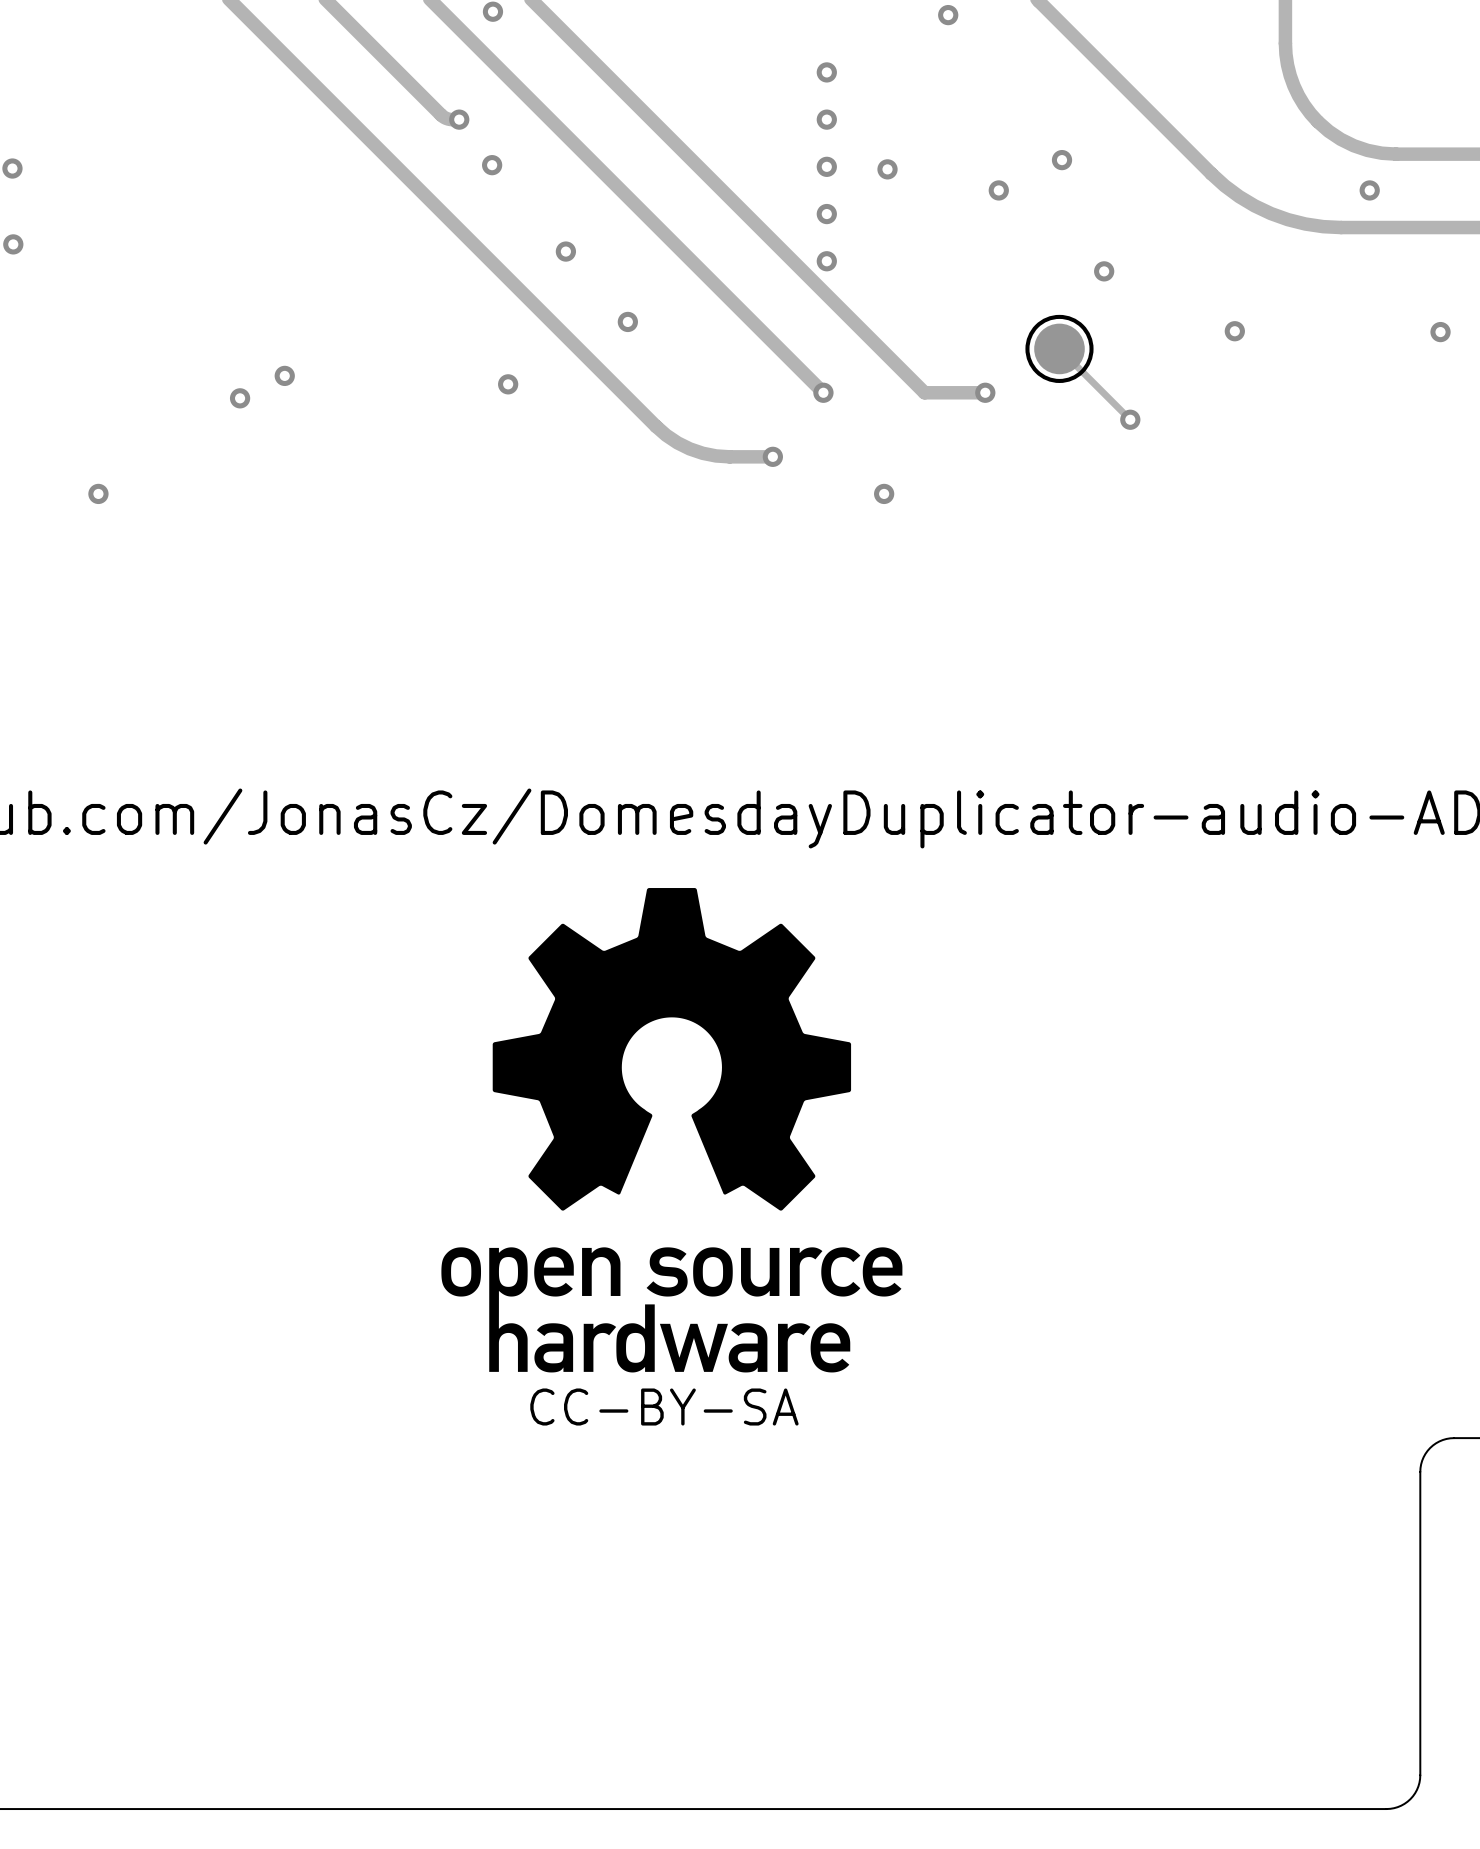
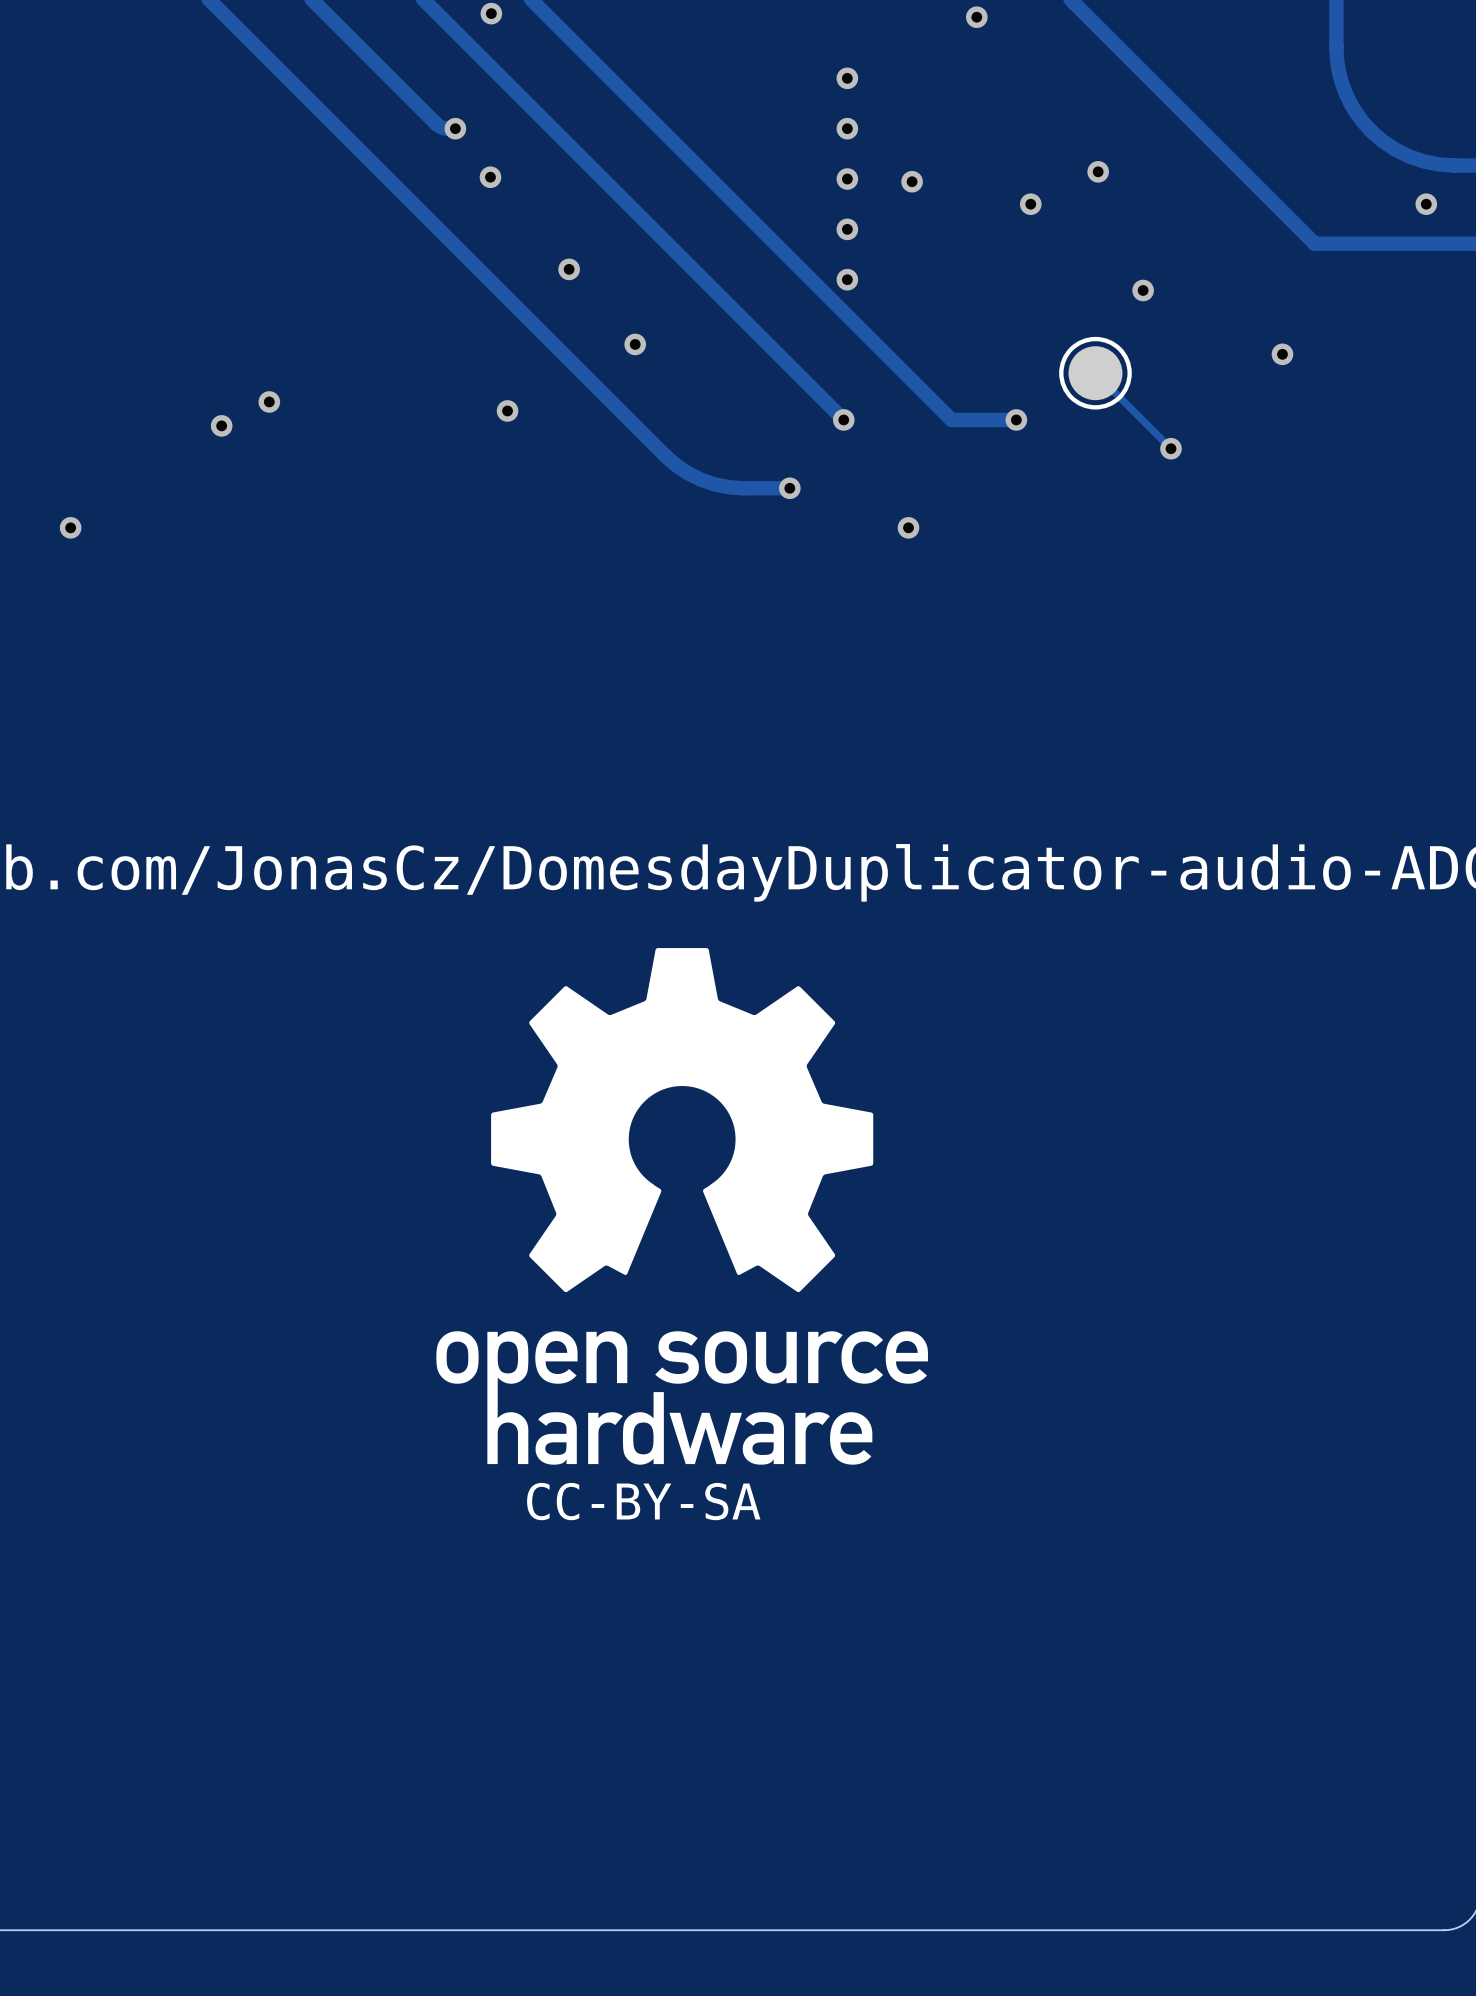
track: (1211, 173) (1239, 196) (1270, 213) (1305, 224) (1341, 227) -> (1257, 186) (1314, 243) (1395, 243)

